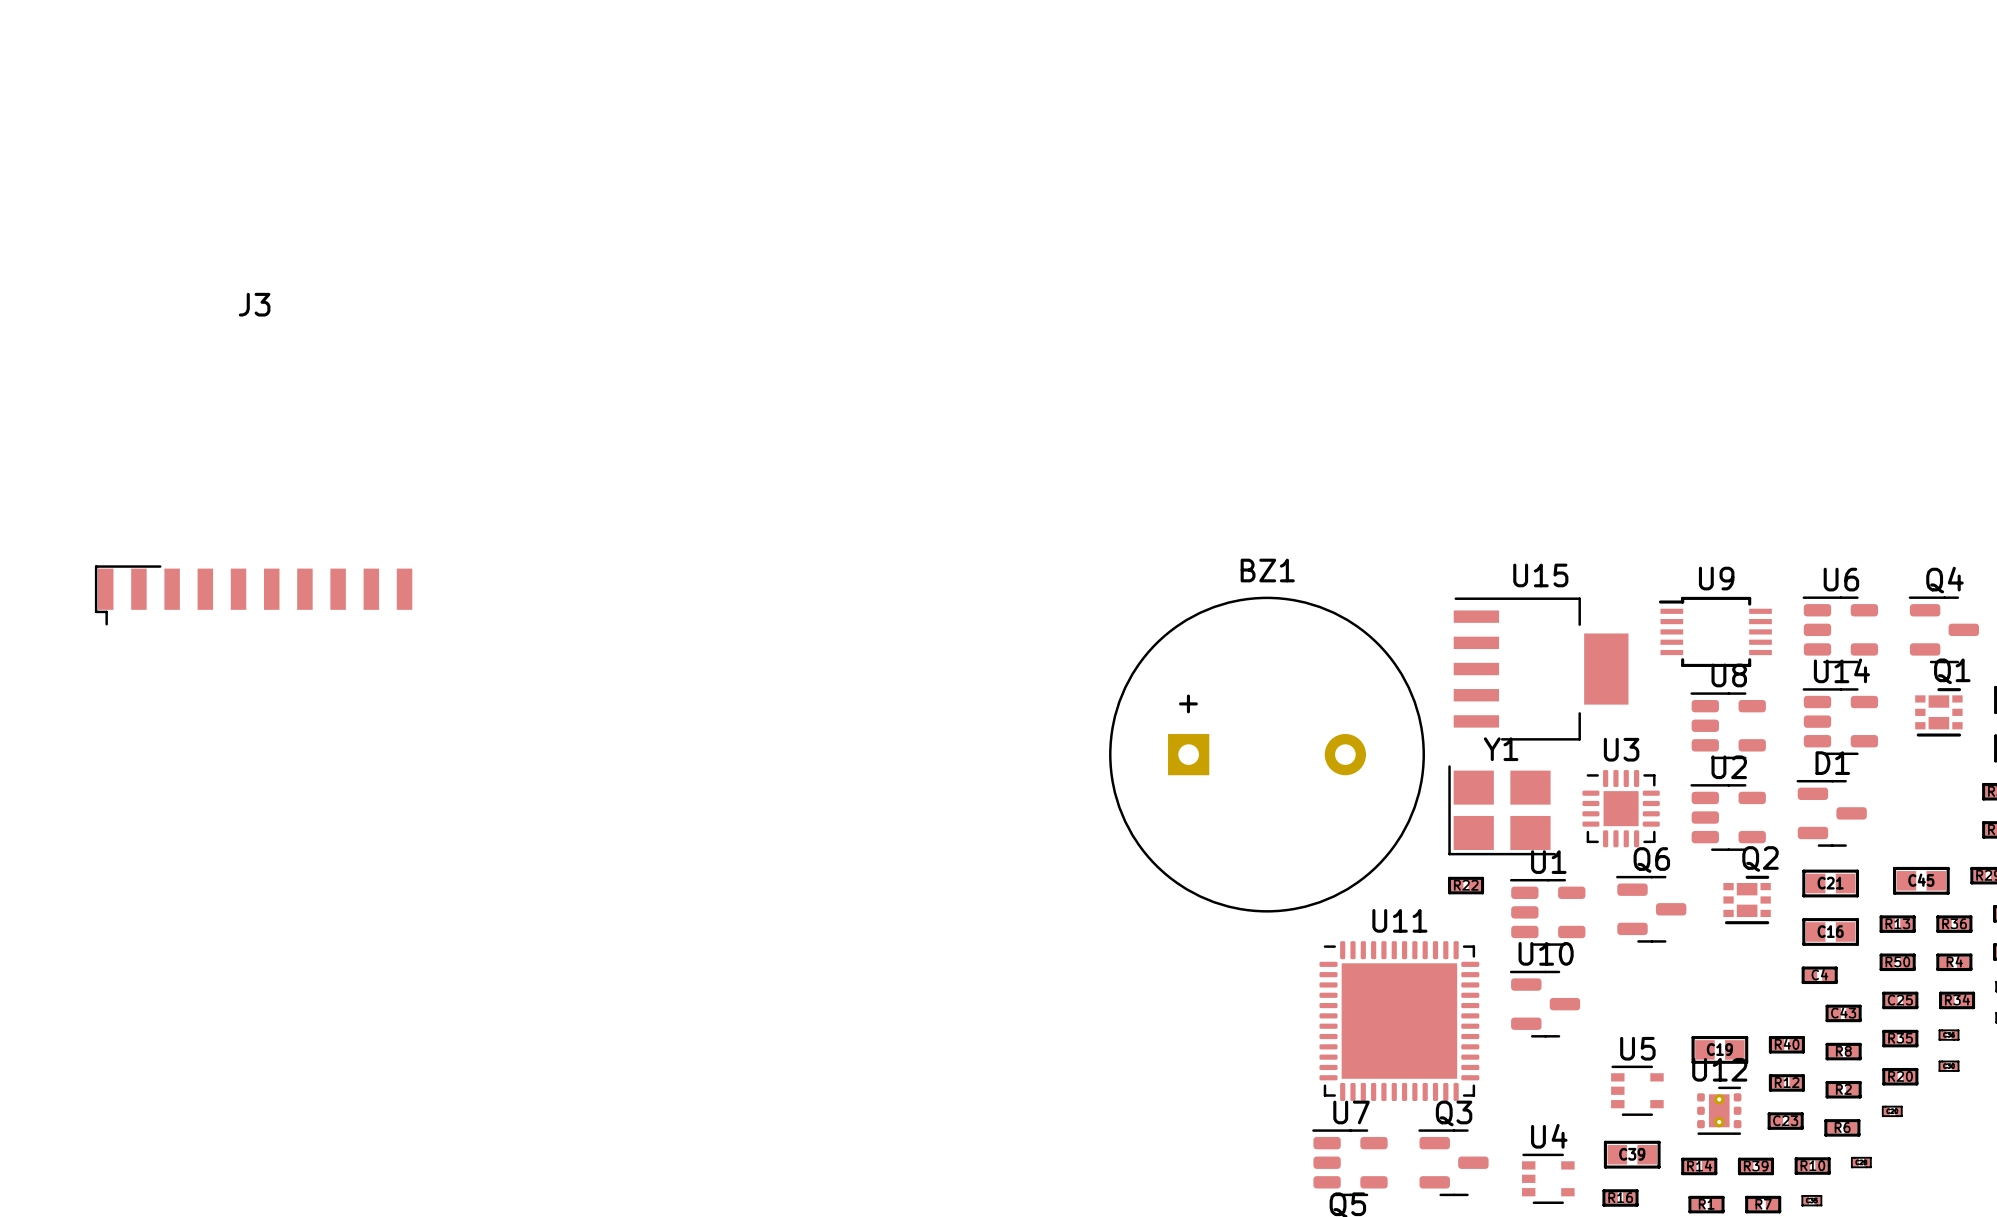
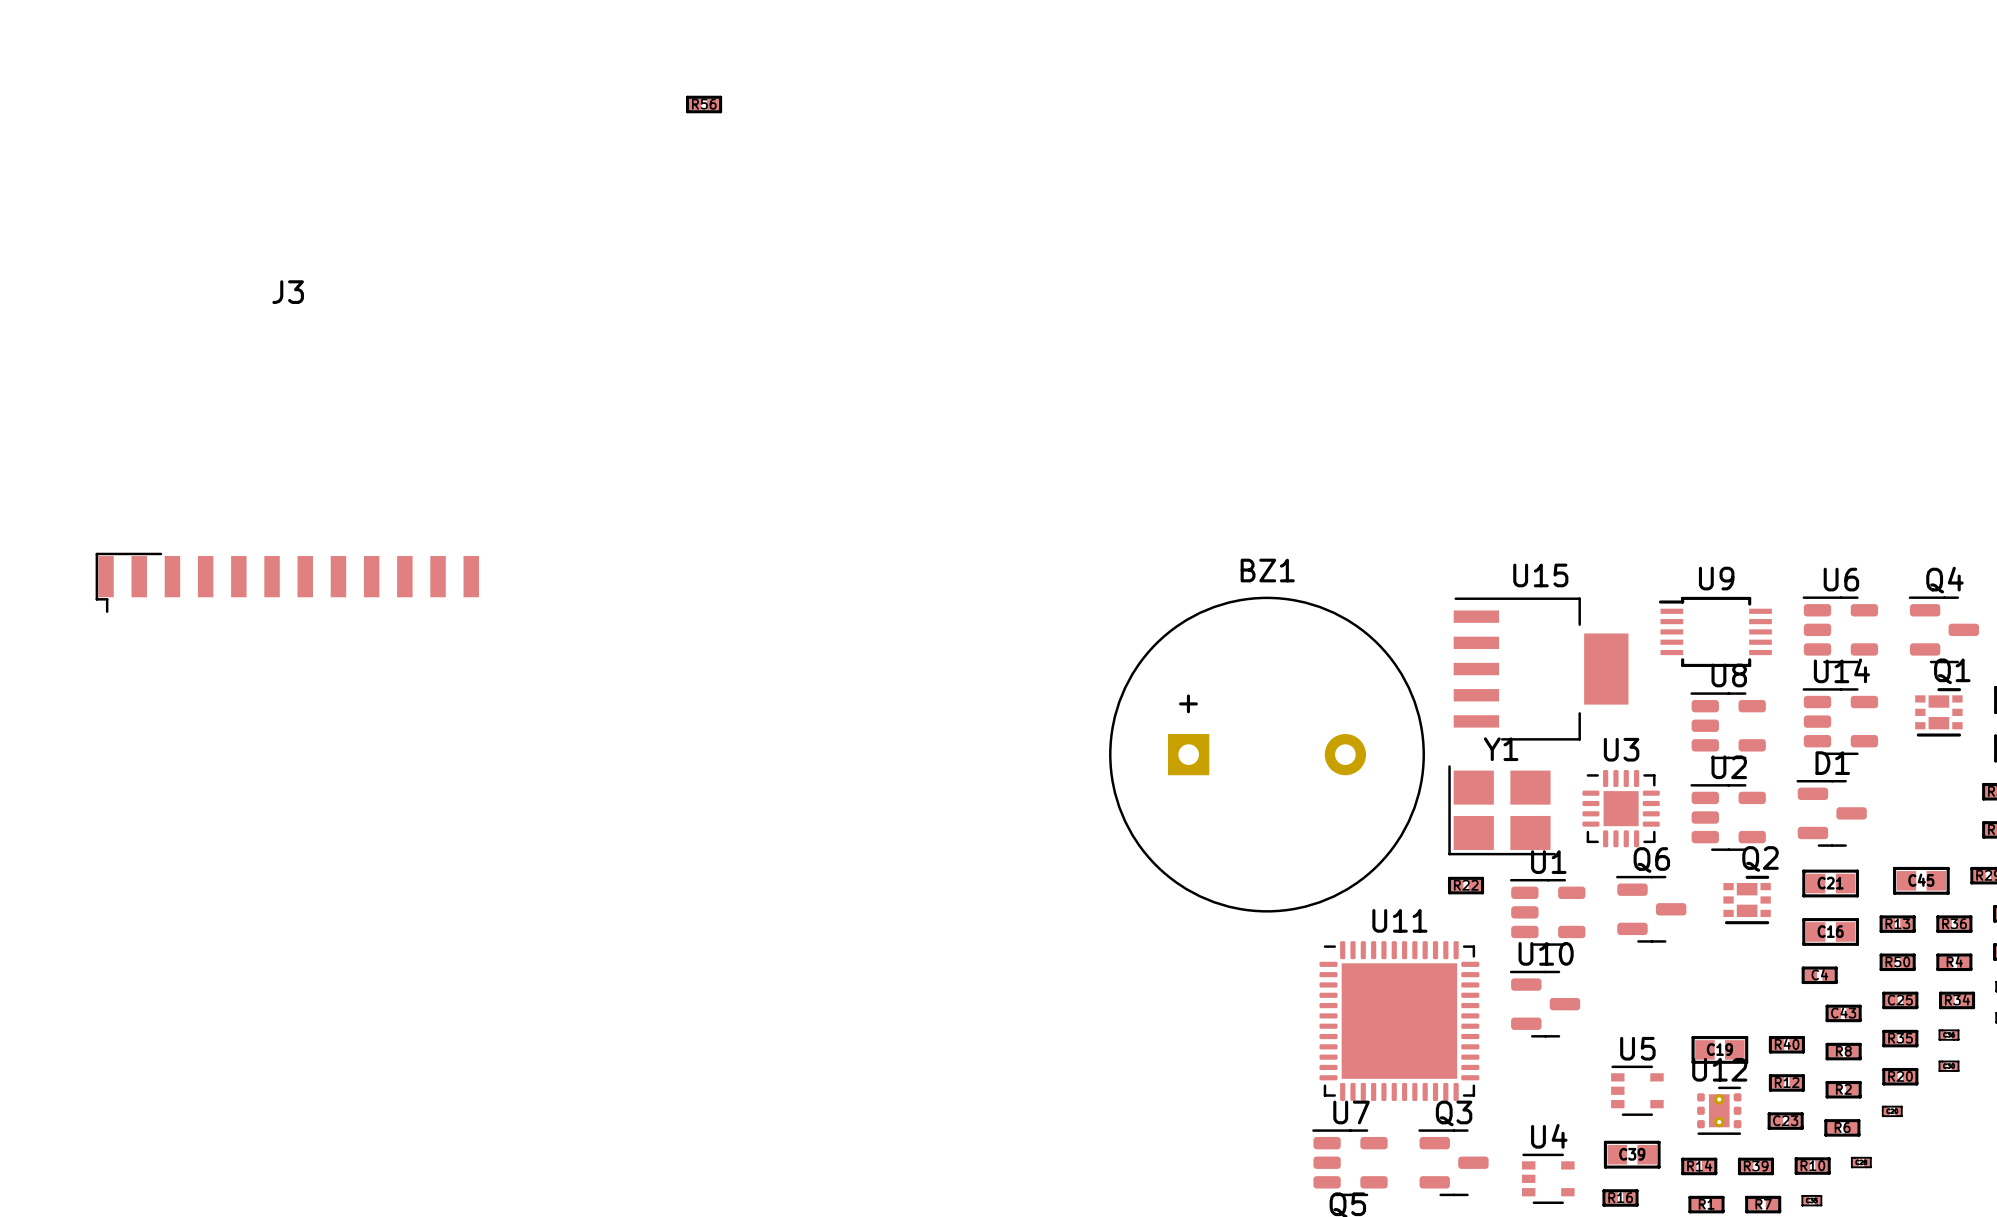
R56: none -> (704, 104)
J3 footprint: [94, 565, 413, 626] -> [95, 552, 479, 613]

